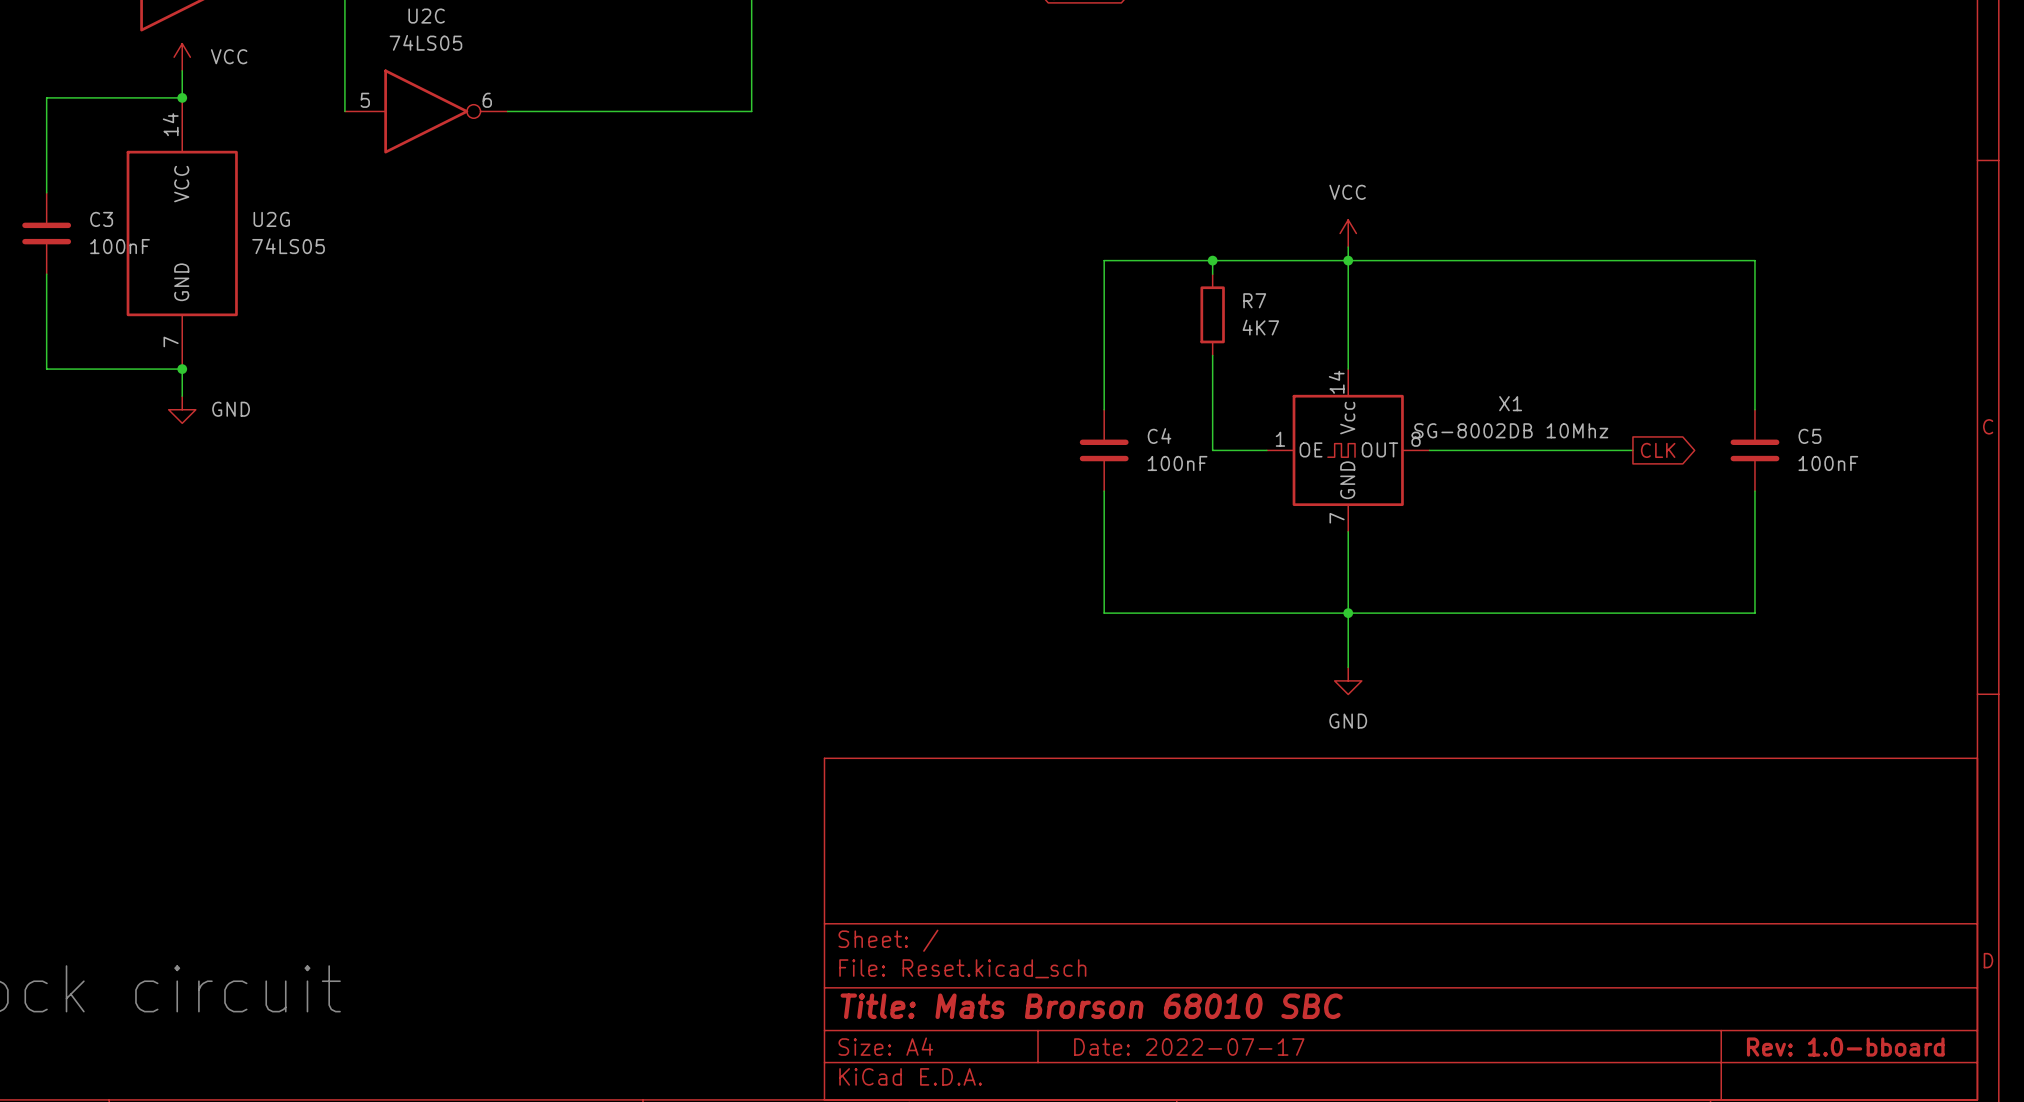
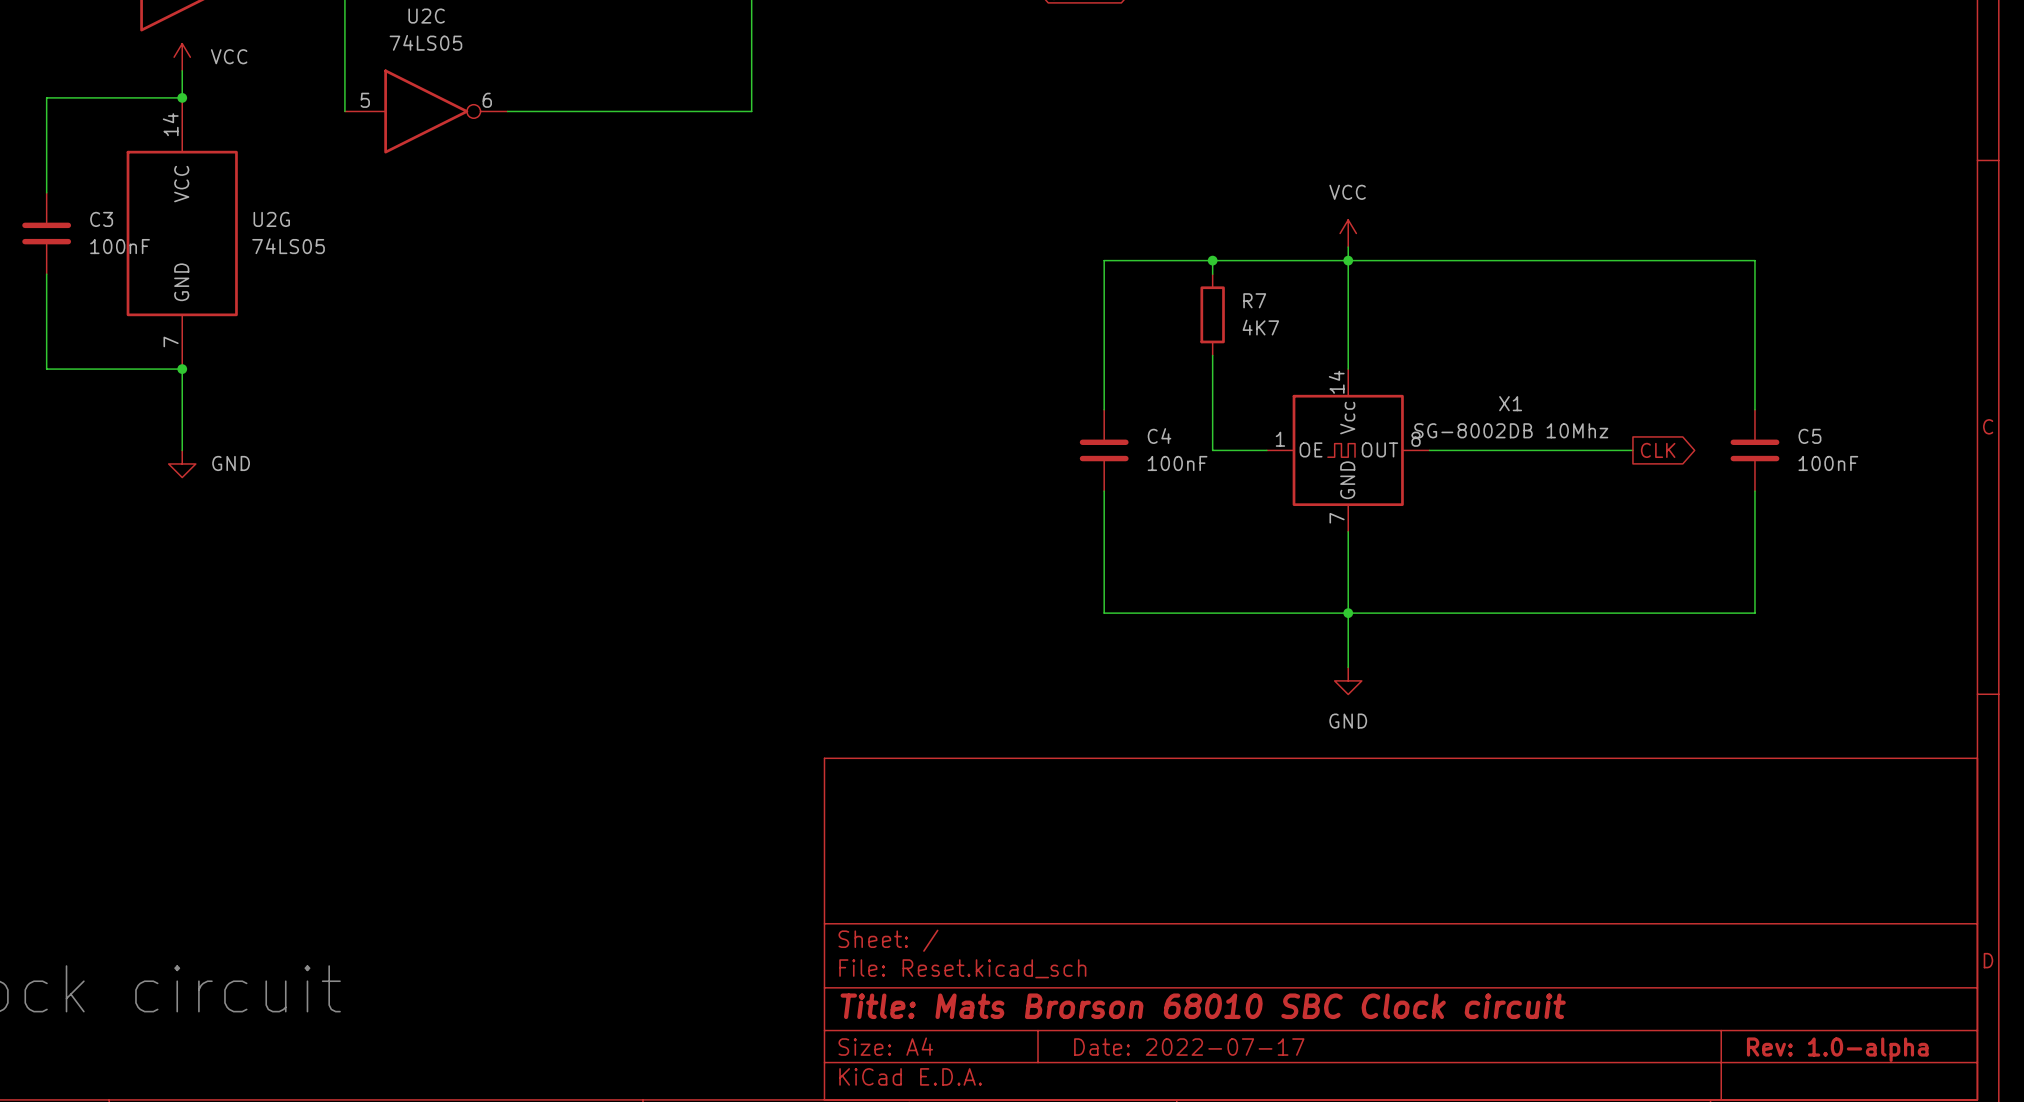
wire: none -> (182, 396) (182, 450)
power symbol position: GND (182, 409) -> GND (182, 463)
title block: Title: Mats Brorson 68010 SBC (1091, 1006) -> Title: Mats Brorson 68010 SBC Clock circuit (1203, 1006)
title block: Rev: 1.0-bboard (1845, 1047) -> Rev: 1.0-alpha (1837, 1049)

